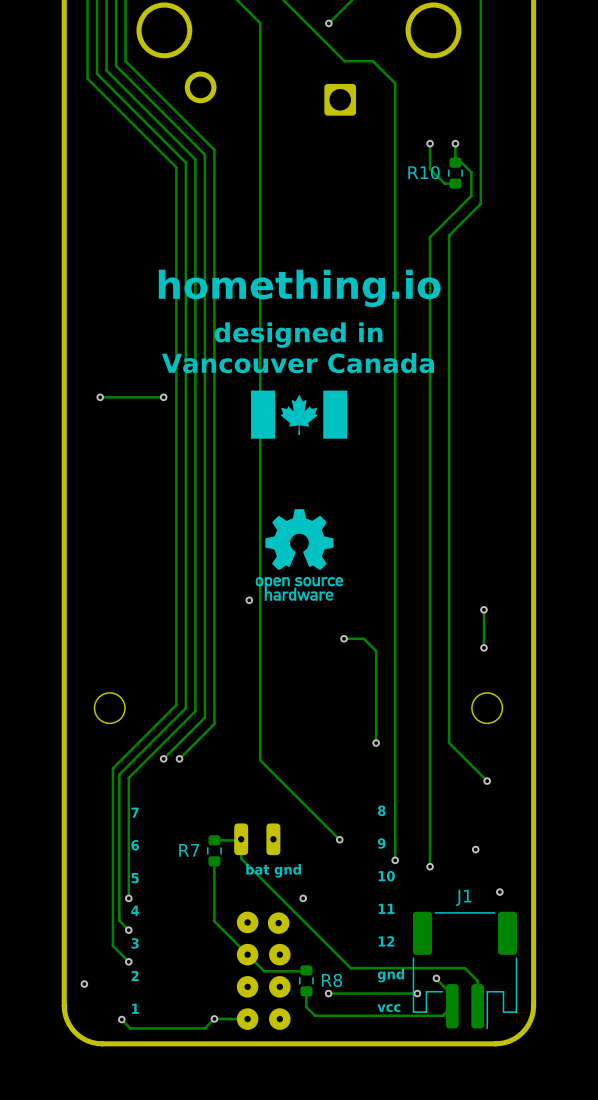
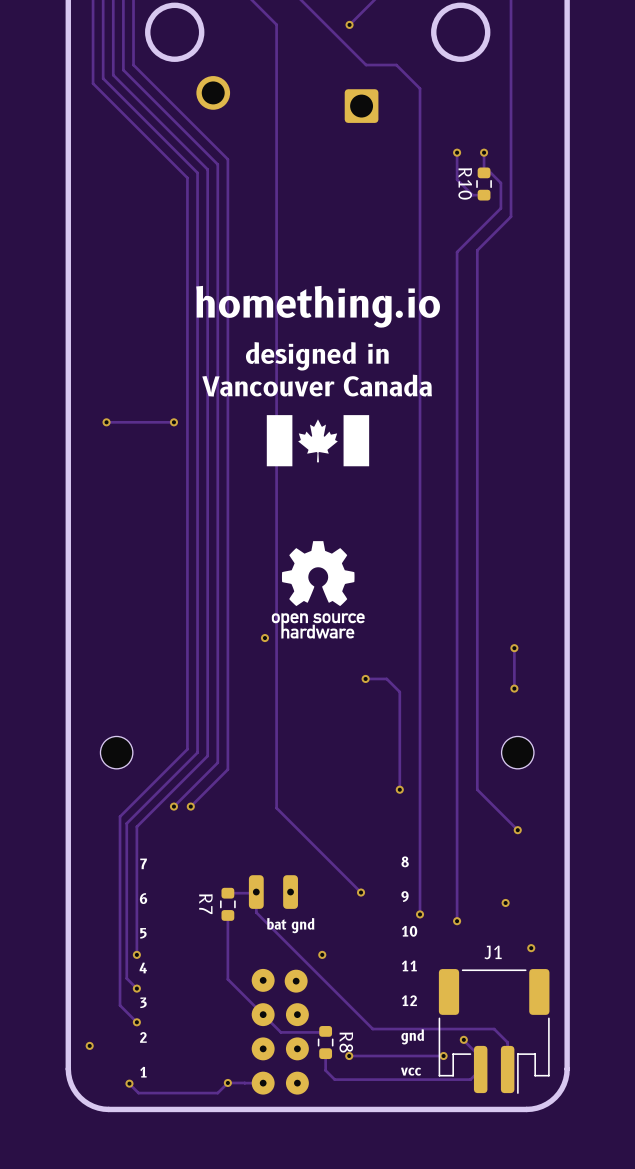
R10 name rotation: 0° (423, 172) -> 90° clockwise (465, 183)
R7 name rotation: 0° (189, 850) -> 90° clockwise (205, 904)
R8 name rotation: 0° (332, 980) -> 90° clockwise (346, 1042)

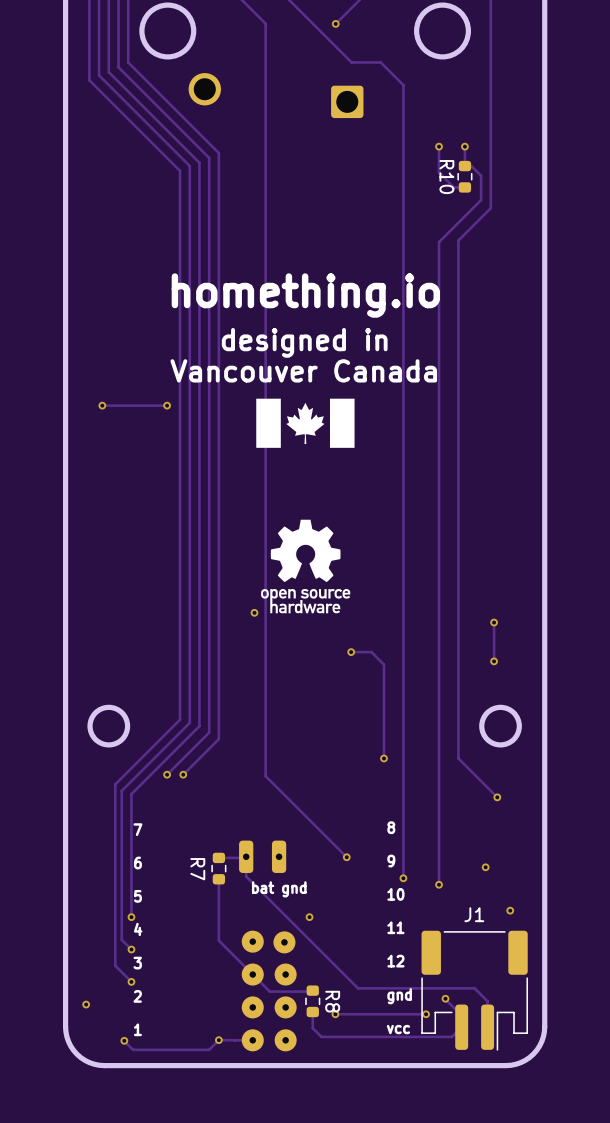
round board edge: none -> [87, 704, 131, 748]
round board edge: none -> [479, 704, 522, 748]
part: (116, 752) -> none
part: (517, 752) -> none

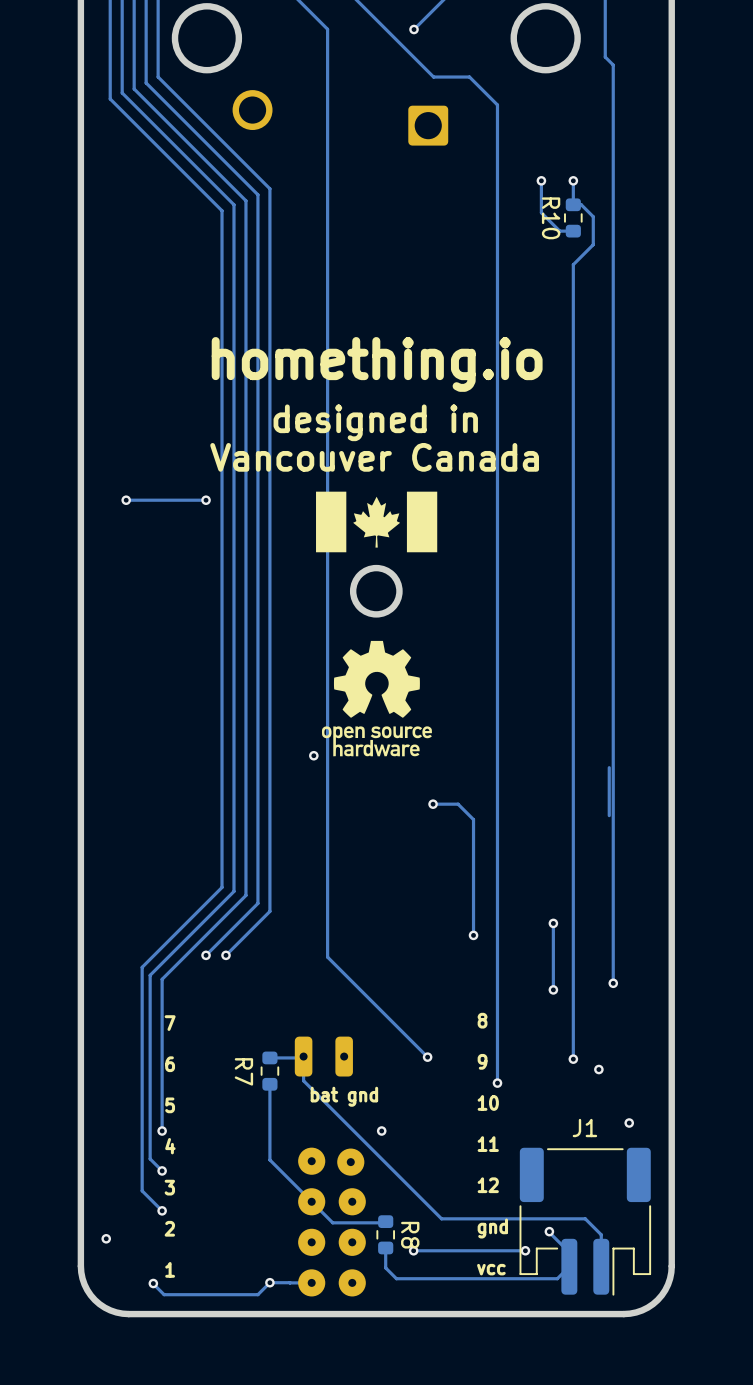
track: (490, 46) (490, 208) (458, 240) (458, 758) (497, 797) -> (605, 57) (613, 65) (613, 983)
track: (481, 198) (439, 242) (439, 884) -> (593, 244) (573, 264) (573, 1059)
round board edge: none -> [349, 564, 403, 618]
via: (494, 622) -> none
via: (494, 661) -> none
round board edge: [87, 704, 131, 748] -> none
round board edge: [479, 704, 522, 748] -> none
track: none -> (553, 923) (553, 989)
via: none -> (553, 923)
via: none -> (553, 989)
via position: (439, 884) -> (573, 1059)

